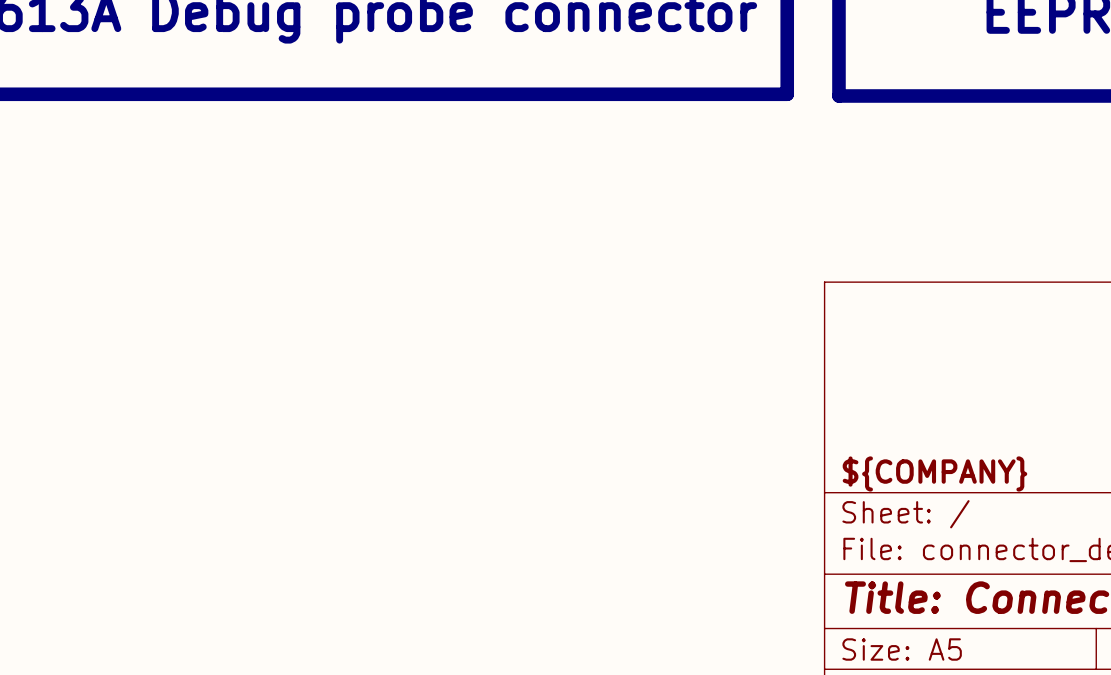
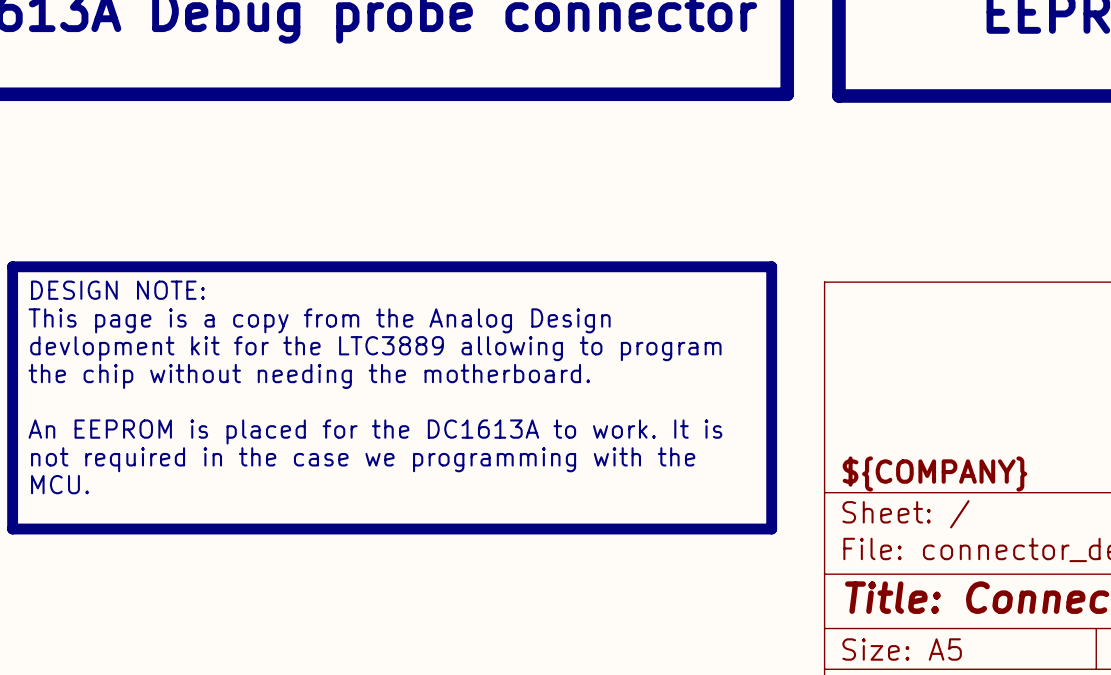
line: none -> (12, 266) (771, 266) (771, 529) (12, 529) (12, 266)
text: none -> DESIGN NOTE: (117, 290)
text: none -> This page is a copy from the Analog Design (319, 320)
text: none -> devlopment kit for the LTC3889 allowing to program (375, 348)
text: none -> the chip without needing the motherboard. (309, 376)
text: none -> An EEPROM is placed for the DC1613A to work. It is (375, 431)
text: none -> not required in the case we programming with the (363, 459)
text: none -> MCU. (59, 484)

